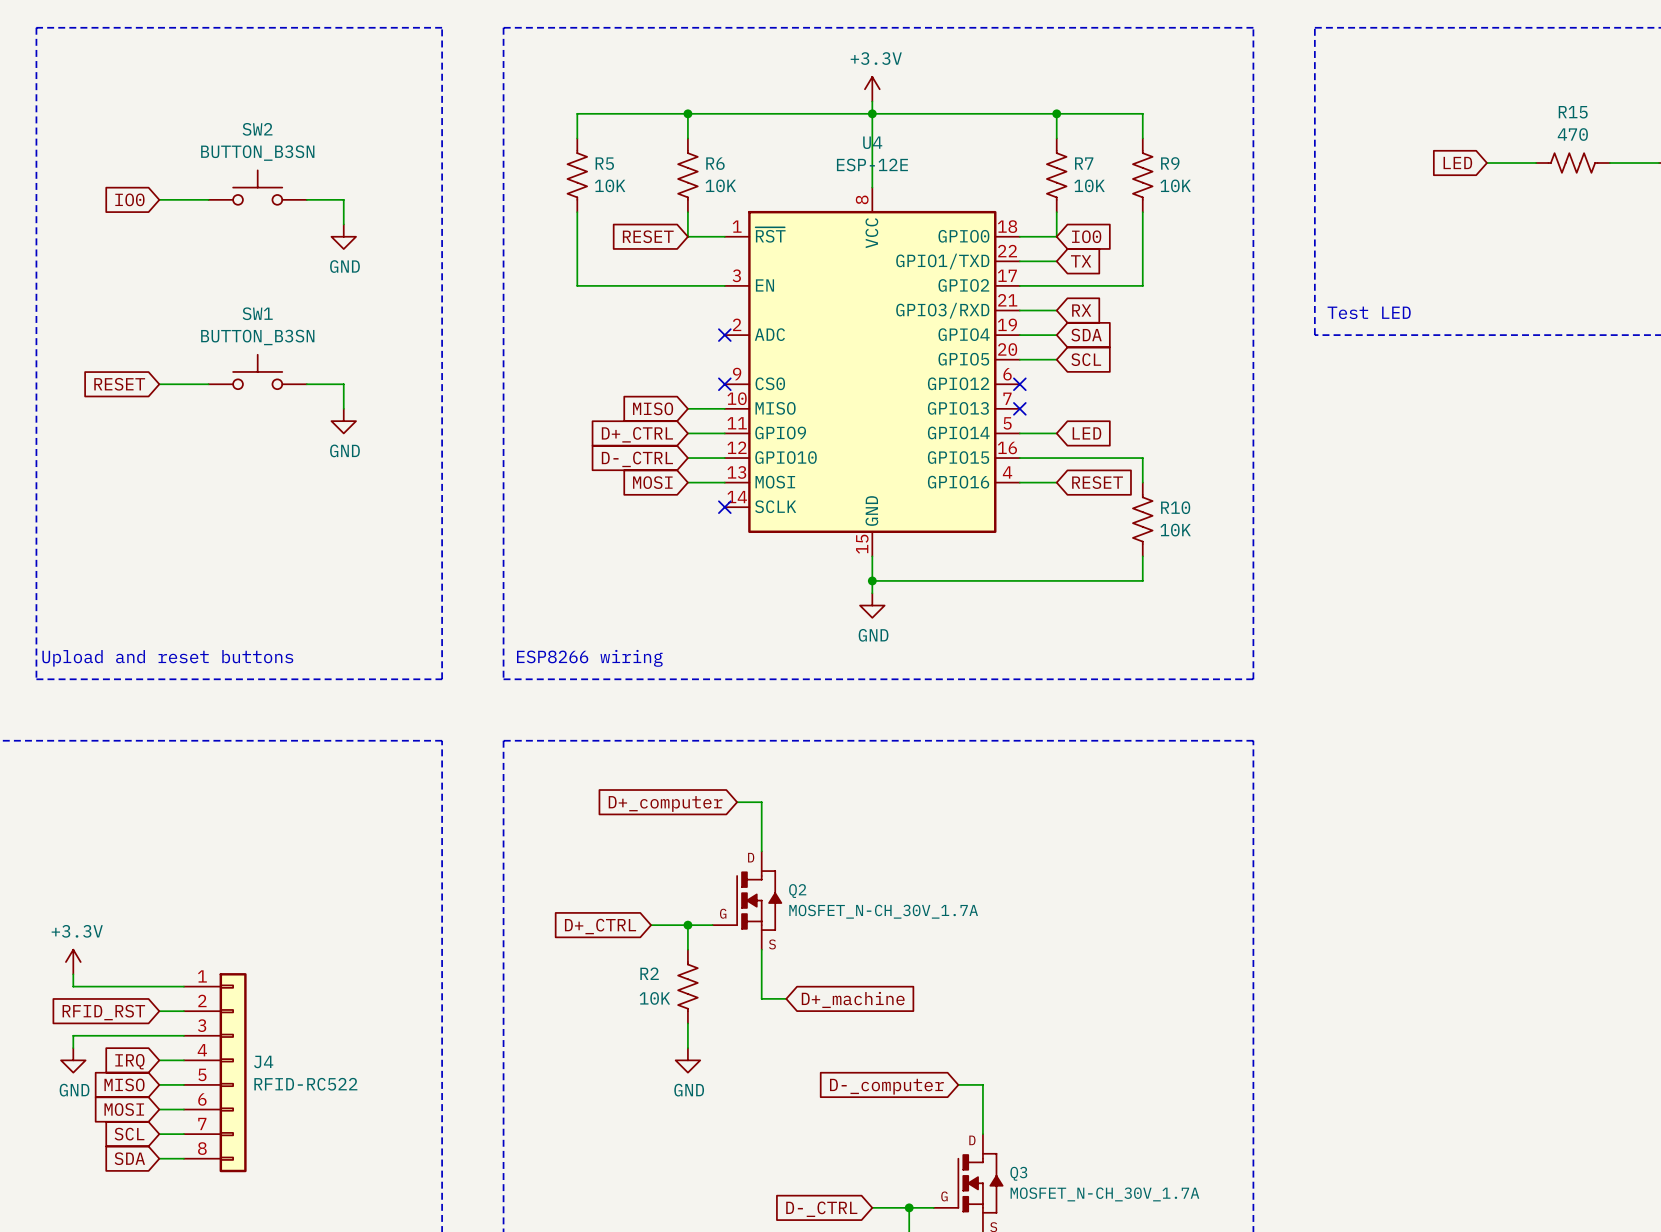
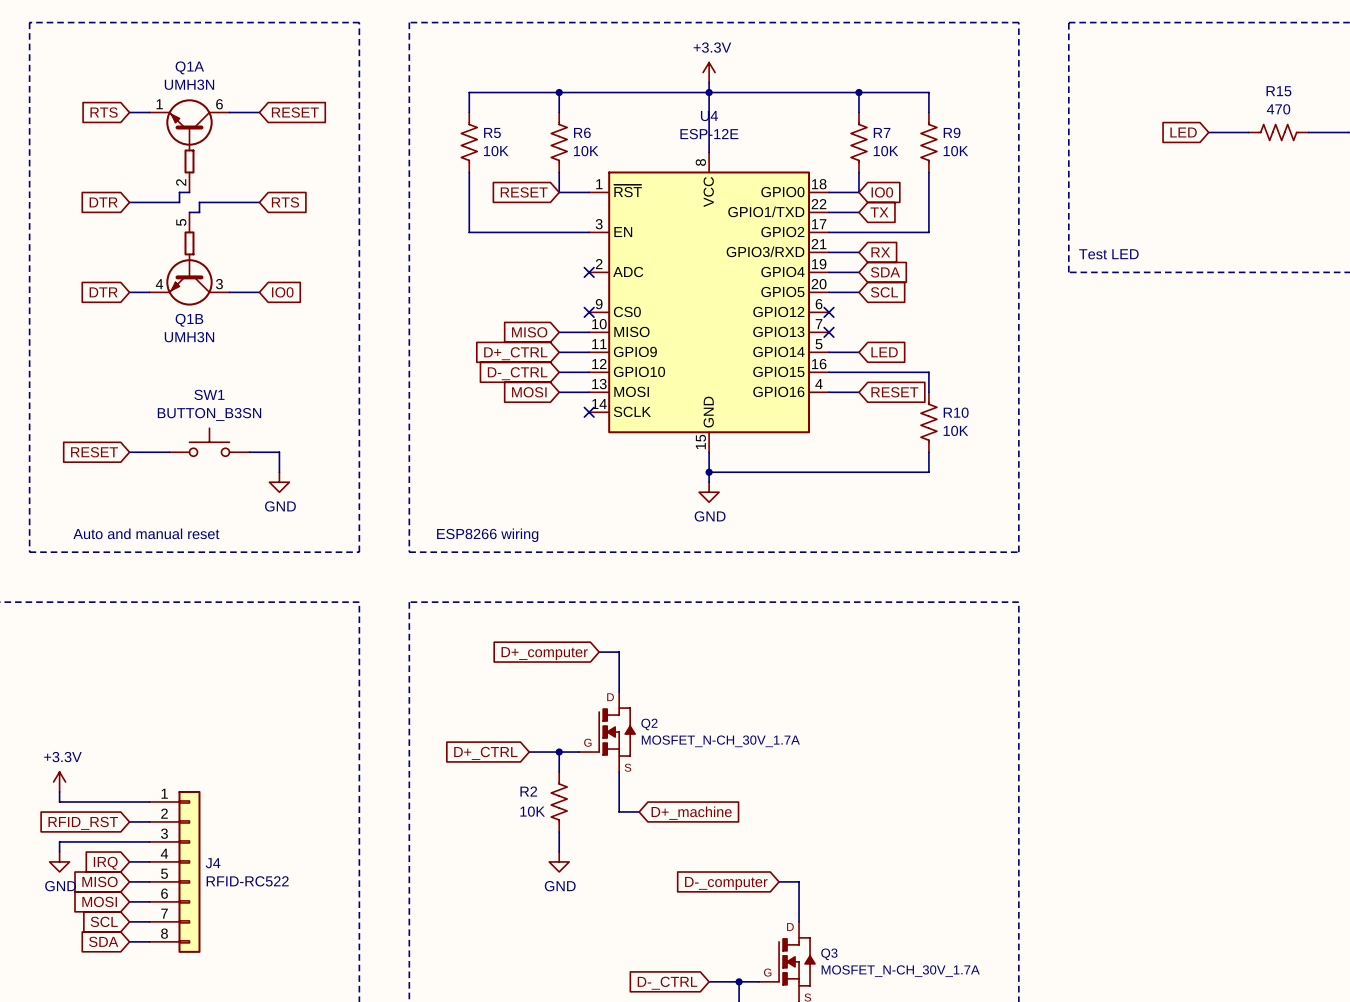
global label: none -> RTS (104, 112)
wire: none -> (129, 112) (149, 112)
wire: none -> (229, 112) (259, 112)
global label: none -> RESET (295, 112)
Q1A: none -> UMH3N (189, 145)
SW2: BUTTON_B3SN (257, 187) -> none
global label rotation: 0° (129, 199) -> 180° (282, 292)
global label position: IO0 (129, 199) -> IO0 (282, 292)
wire: (159, 199) (208, 199) -> none
wire: (306, 199) (343, 199) (343, 224) -> none
wire: none -> (189, 192) (179, 192) (179, 202) (129, 202)
power symbol: GND (343, 236) -> none
global label: none -> DTR (103, 202)
wire: none -> (259, 202) (199, 202) (199, 212) (189, 212)
global label: none -> RTS (285, 202)
Q1B: none -> UMH3N (189, 259)
global label: none -> DTR (103, 292)
wire: none -> (129, 292) (149, 292)
wire: none -> (229, 292) (259, 292)
SW1 position: (257, 371) -> (209, 442)
global label: RESET (119, 384) -> none
wire: (159, 384) (208, 384) -> (129, 452) (169, 452)
wire: (306, 384) (343, 384) (343, 408) -> (249, 452) (279, 452) (279, 472)
power symbol position: GND (343, 421) -> GND (279, 482)
global label: none -> RESET (94, 452)
text: none -> Auto and manual reset (146, 533)
text: Upload and reset buttons (167, 658) -> none

